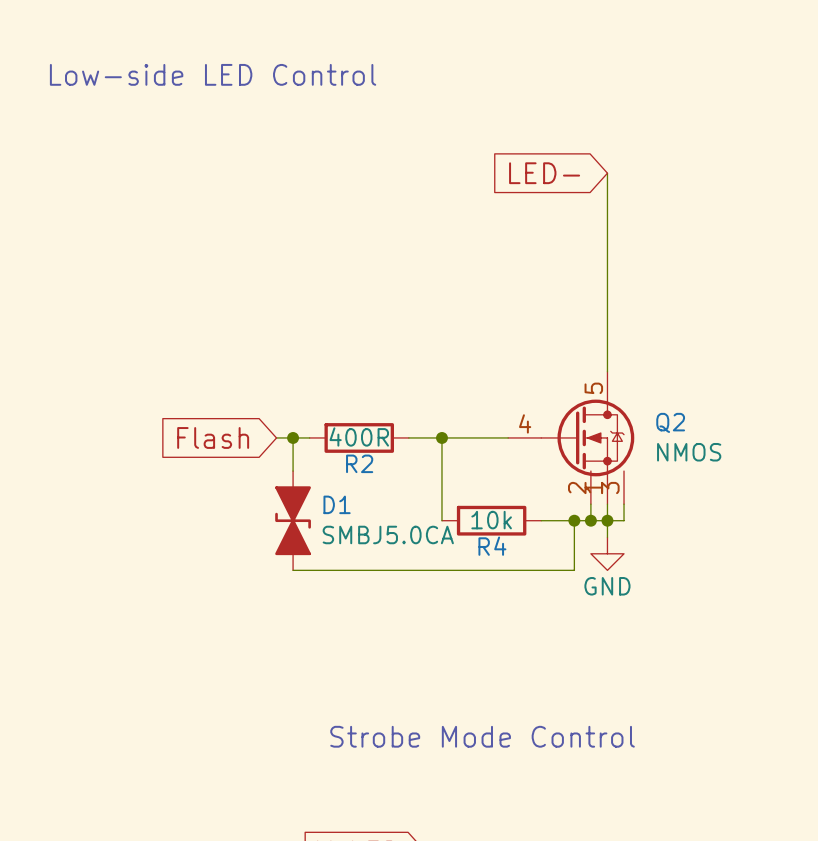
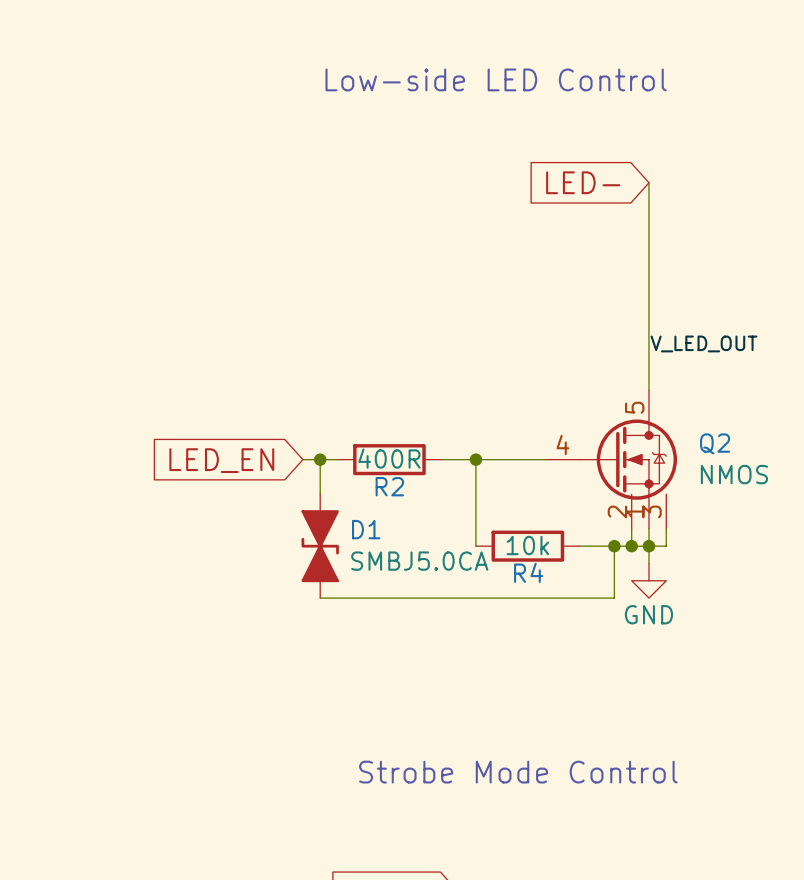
text position: Low-side LED Control (213, 74) -> Low-side LED Control (496, 79)
label: none -> V_LED_OUT (704, 343)
global label: Flash (213, 437) -> LED_EN (221, 460)

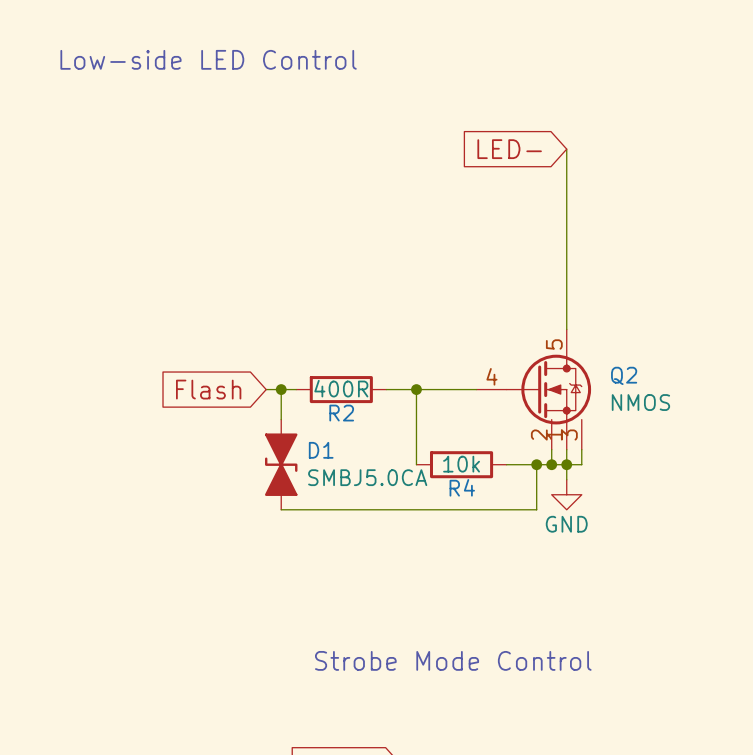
text position: Low-side LED Control (496, 79) -> Low-side LED Control (208, 59)
label: V_LED_OUT (704, 343) -> none
global label: LED_EN (221, 460) -> Flash (208, 389)

